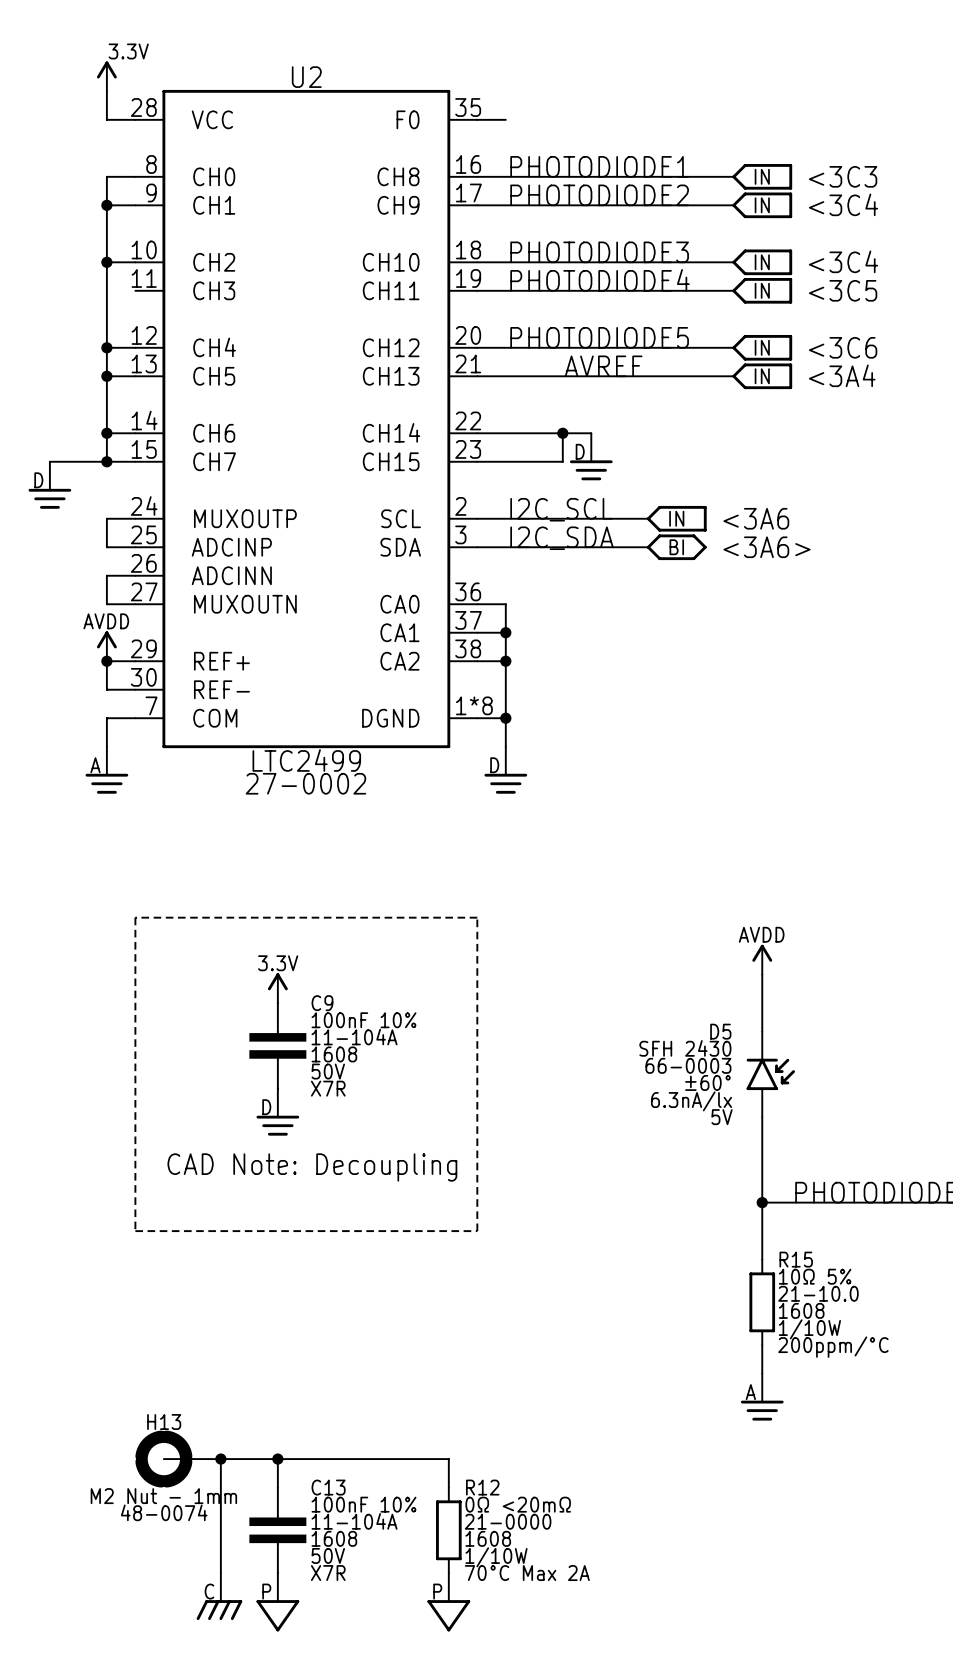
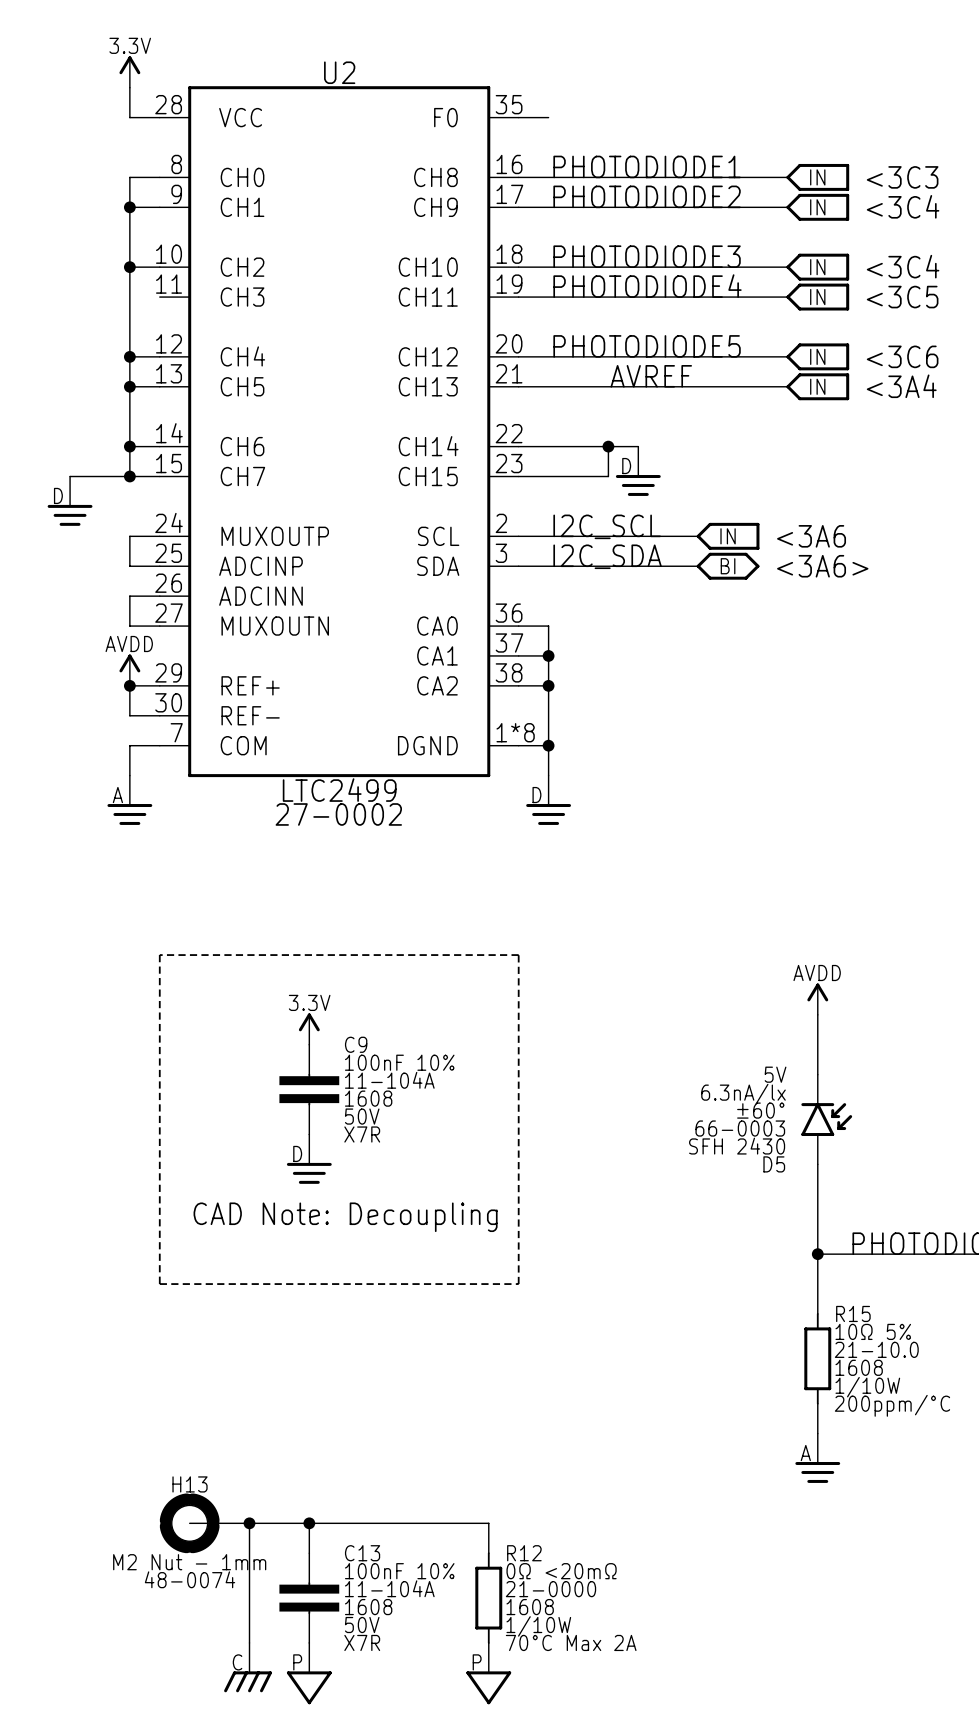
power symbol text position: 3.3V (128, 51) -> 3.3V (130, 45)
D5 name position: D5 (720, 1031) -> D5 (774, 1164)
D5 value position: SFH 2430 (685, 1048) -> SFH 2430 (737, 1146)
D5 text position: 66-0003 (688, 1065) -> 66-0003 (740, 1128)
D5 text position: ±60° (707, 1082) -> ±60° (760, 1110)
D5 text position: 6.3nA/lx (691, 1101) -> 6.3nA/lx (743, 1094)
D5 text position: 5V (722, 1117) -> 5V (775, 1074)

